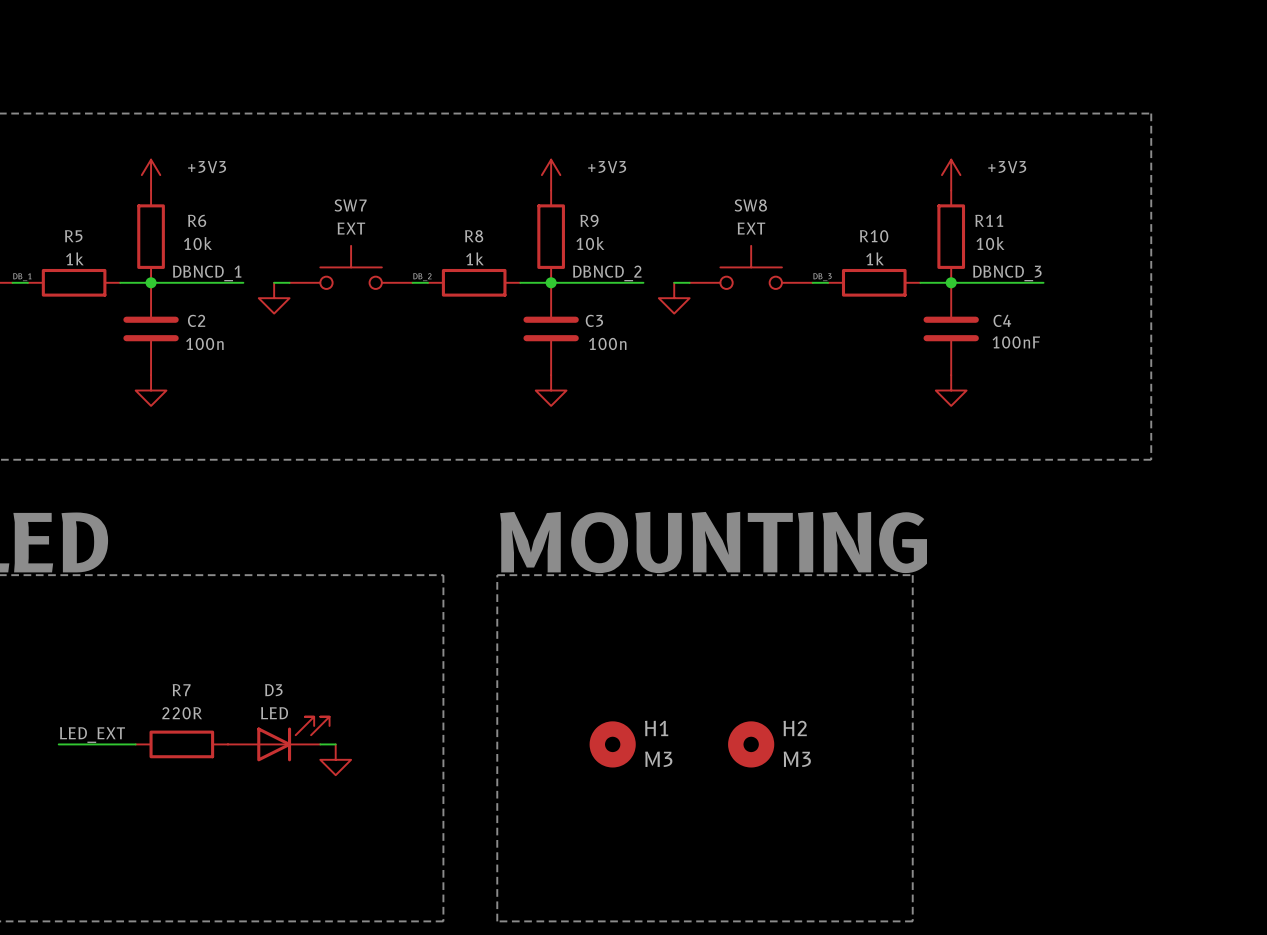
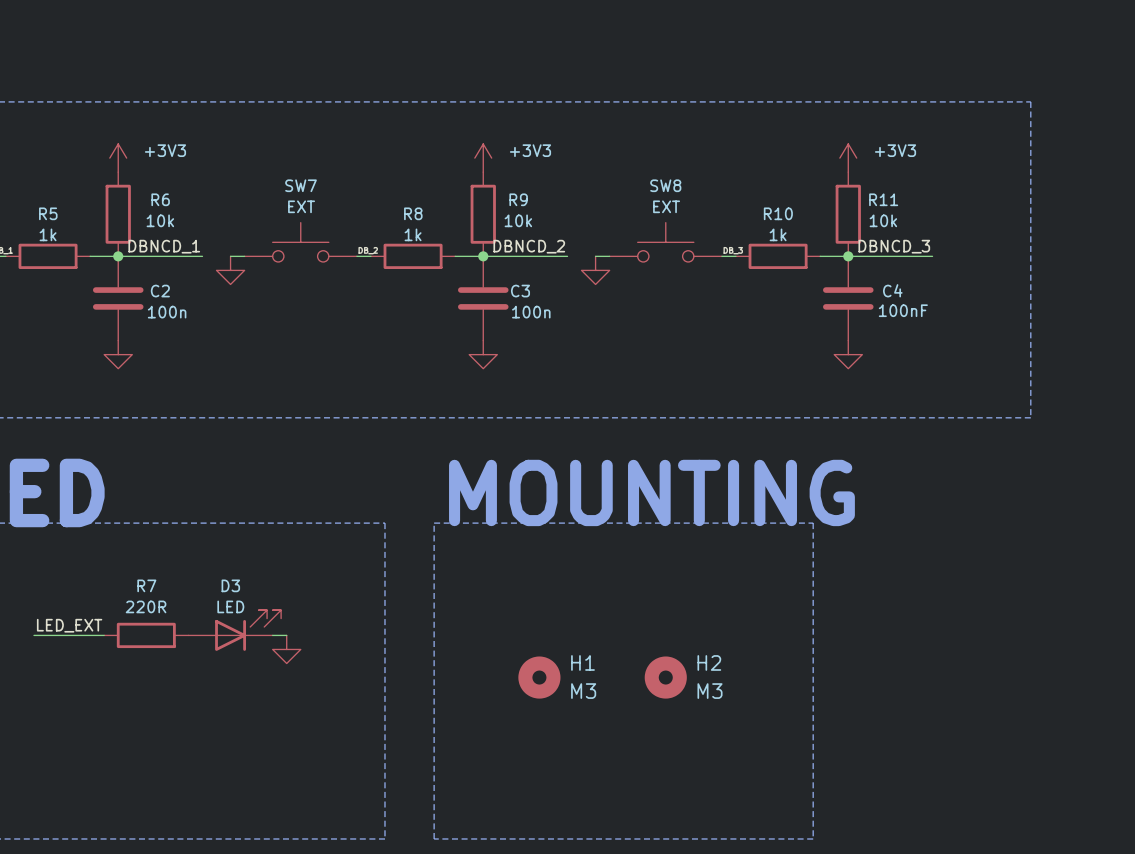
label position: LED_EXT (92, 735) -> LED_EXT (69, 625)
D3 position: (278, 739) -> (234, 630)
wire: (58, 744) (135, 744) -> (34, 635) (104, 635)
R7 position: (181, 744) -> (146, 635)
wire: (320, 744) (335, 744) -> (272, 635) (286, 635)
power symbol position: (335, 759) -> (286, 649)

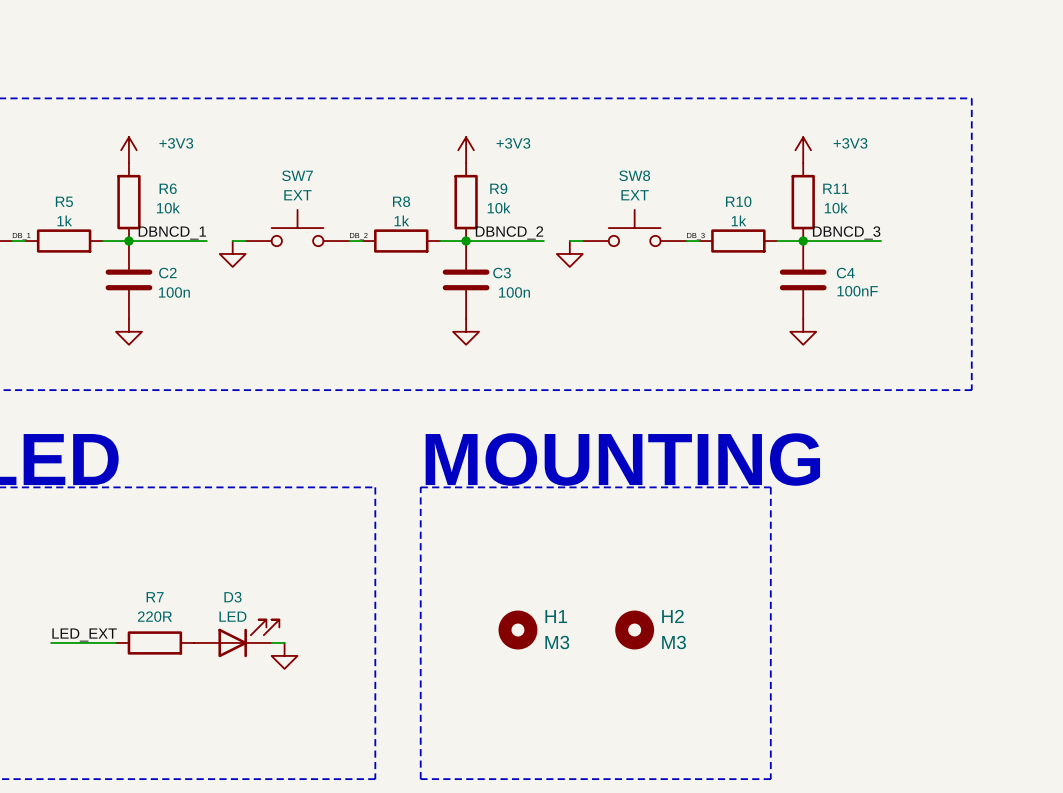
label position: LED_EXT (69, 625) -> LED_EXT (84, 635)
D3 position: (234, 630) -> (236, 638)
wire: (34, 635) (104, 635) -> (51, 642) (116, 642)
R7 position: (146, 635) -> (154, 642)
wire: (272, 635) (286, 635) -> (271, 642) (284, 642)
power symbol position: (286, 649) -> (284, 655)

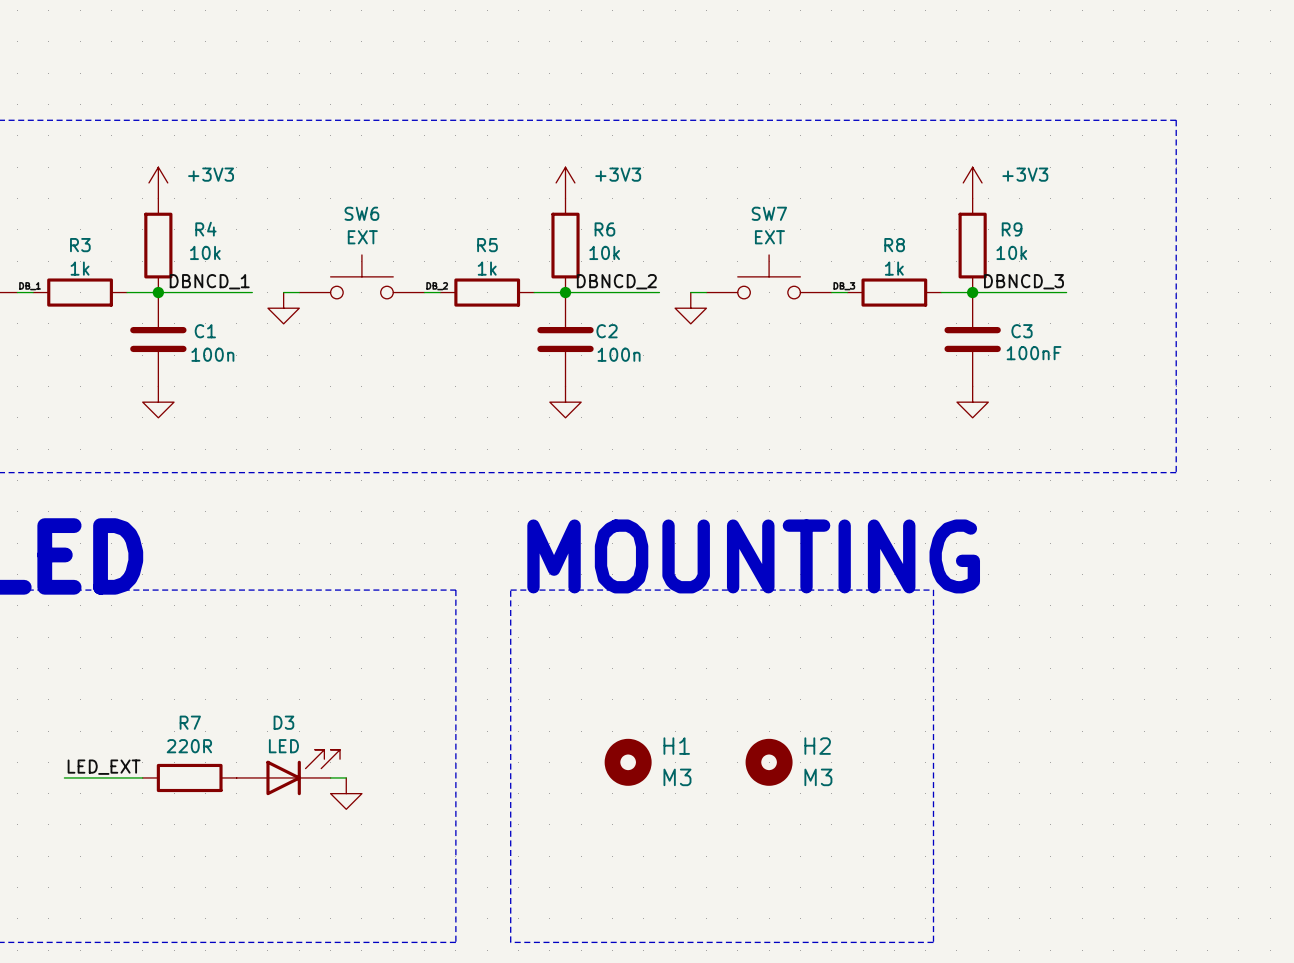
SW7 name: SW7 (297, 175) -> SW6 (361, 213)
SW8 name: SW8 (634, 175) -> SW7 (769, 213)
R6 name: R6 (168, 188) -> R4 (205, 229)
R9 name: R9 (498, 188) -> R6 (604, 229)
R11 name: R11 (835, 188) -> R9 (1012, 229)
R5 name: R5 (64, 201) -> R3 (80, 245)
R8 name: R8 (401, 201) -> R5 (487, 245)
R10 name: R10 (738, 201) -> R8 (894, 245)
C2 name: C2 (167, 273) -> C1 (205, 331)
C3 name: C3 (502, 273) -> C2 (607, 331)
C4 name: C4 (845, 273) -> C3 (1022, 331)

